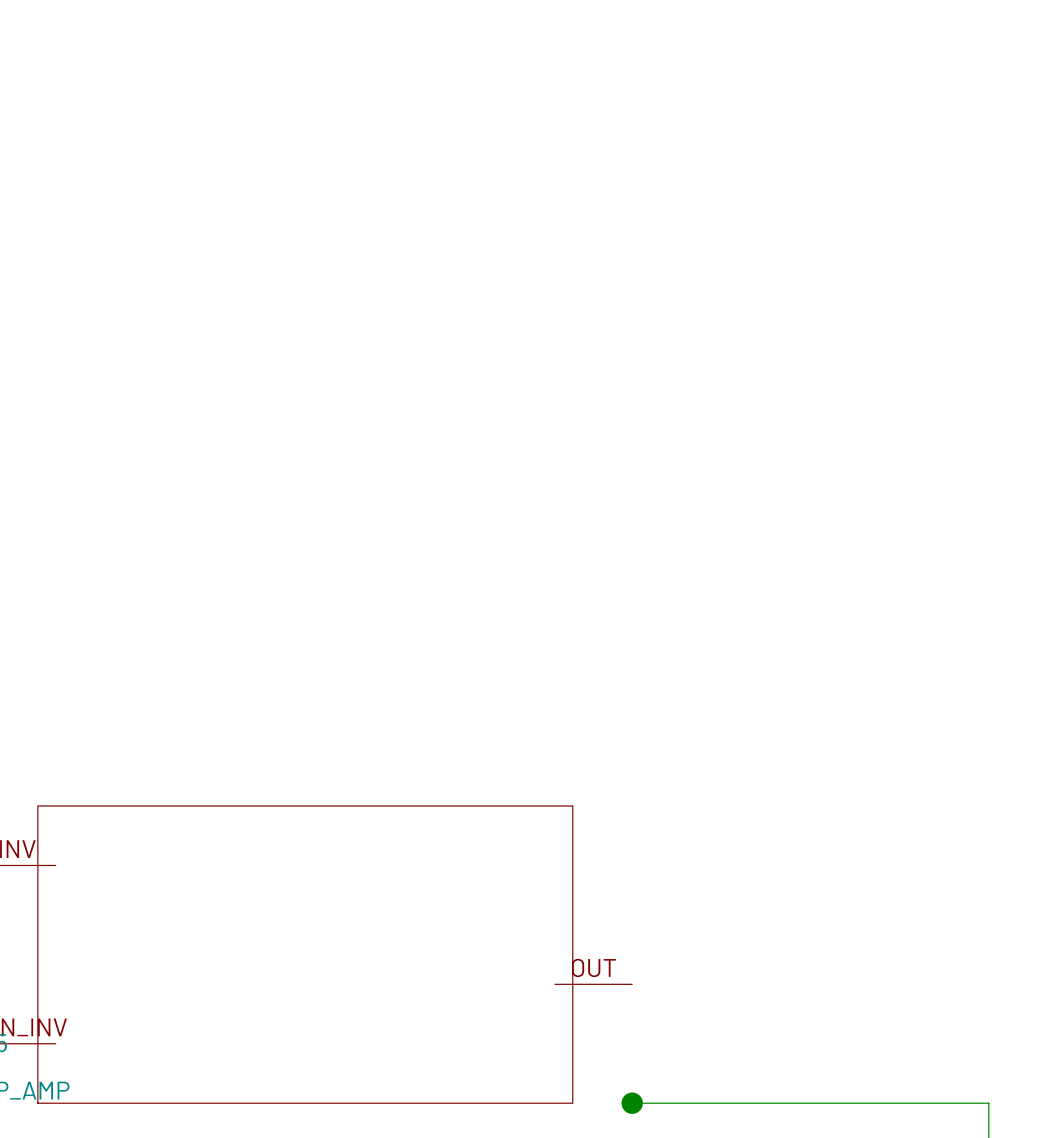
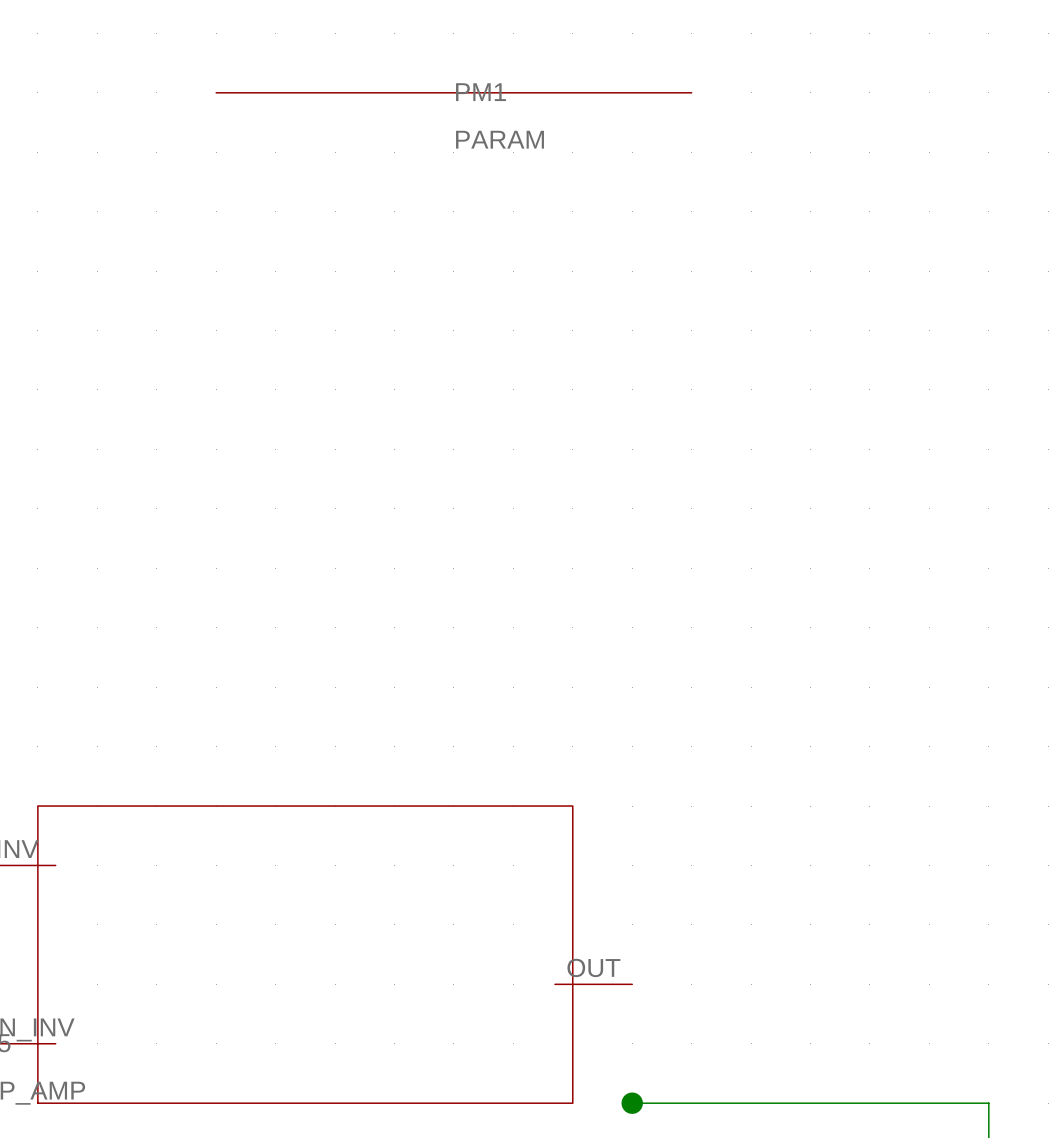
PM1: none -> PARAM (453, 92)

